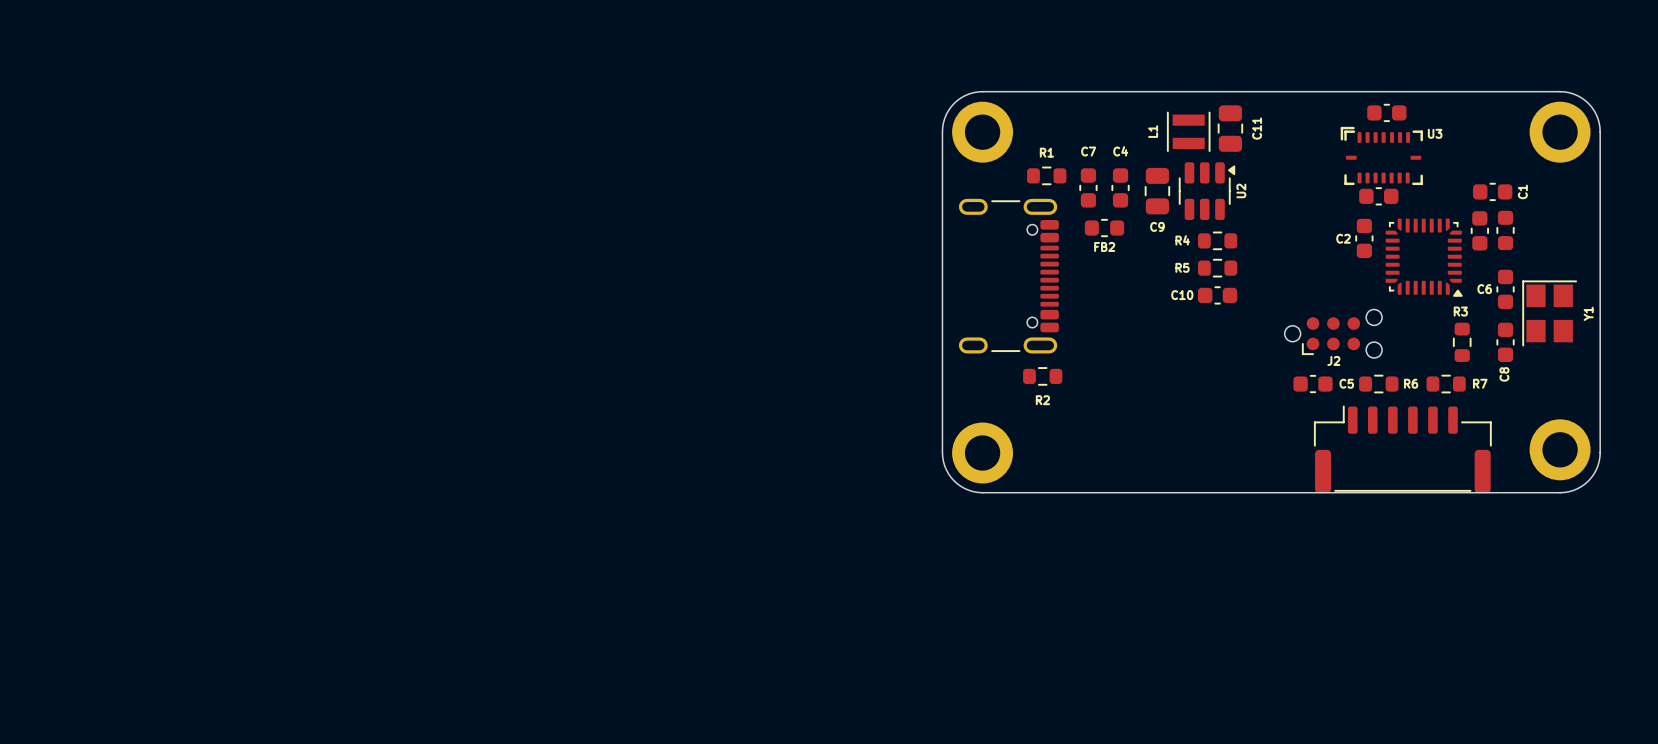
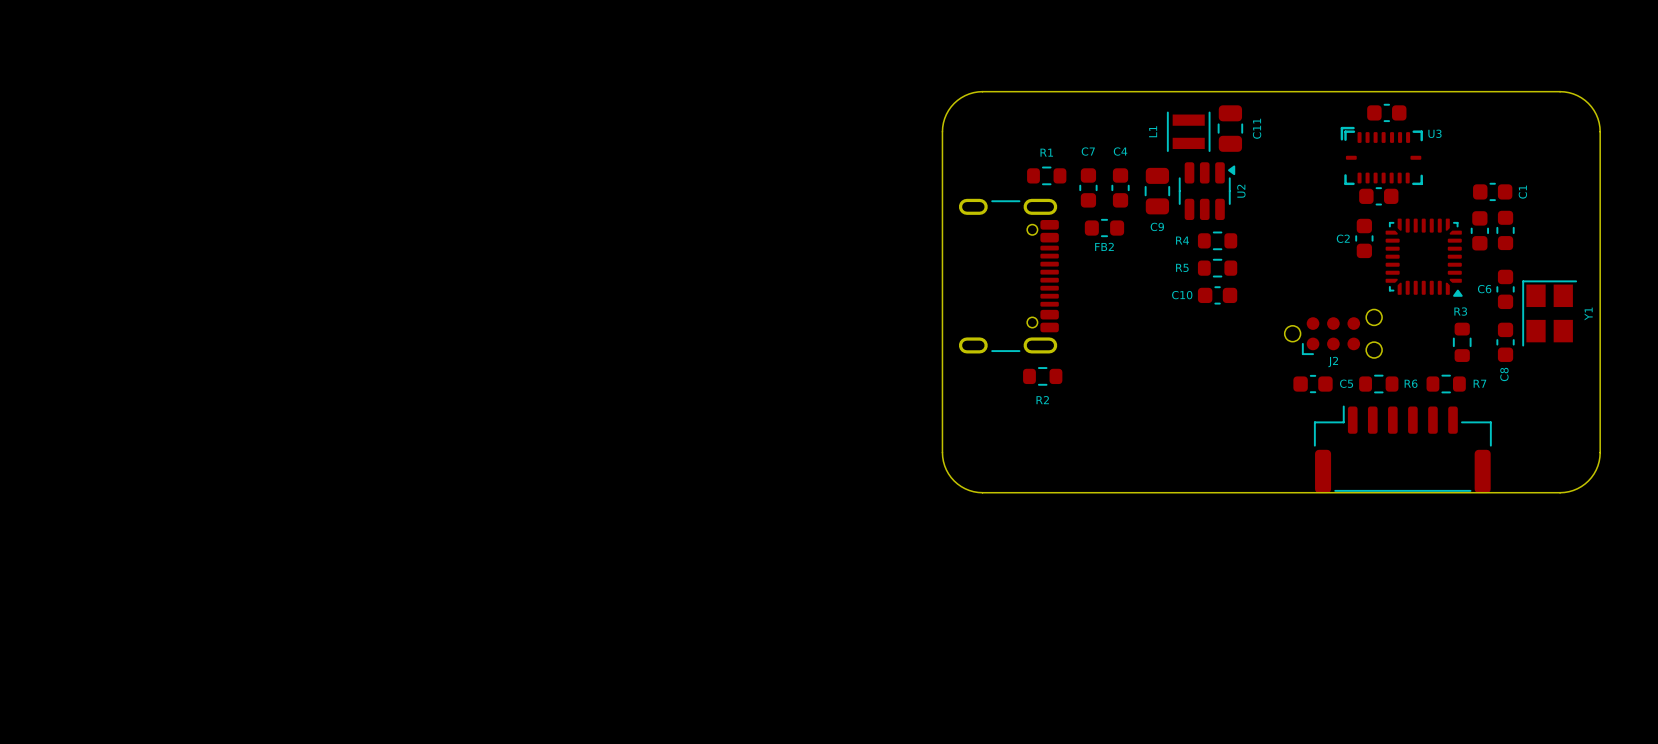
part: (982, 132) -> none
part: (1560, 132) -> none
part: (1560, 449) -> none
part: (982, 453) -> none

